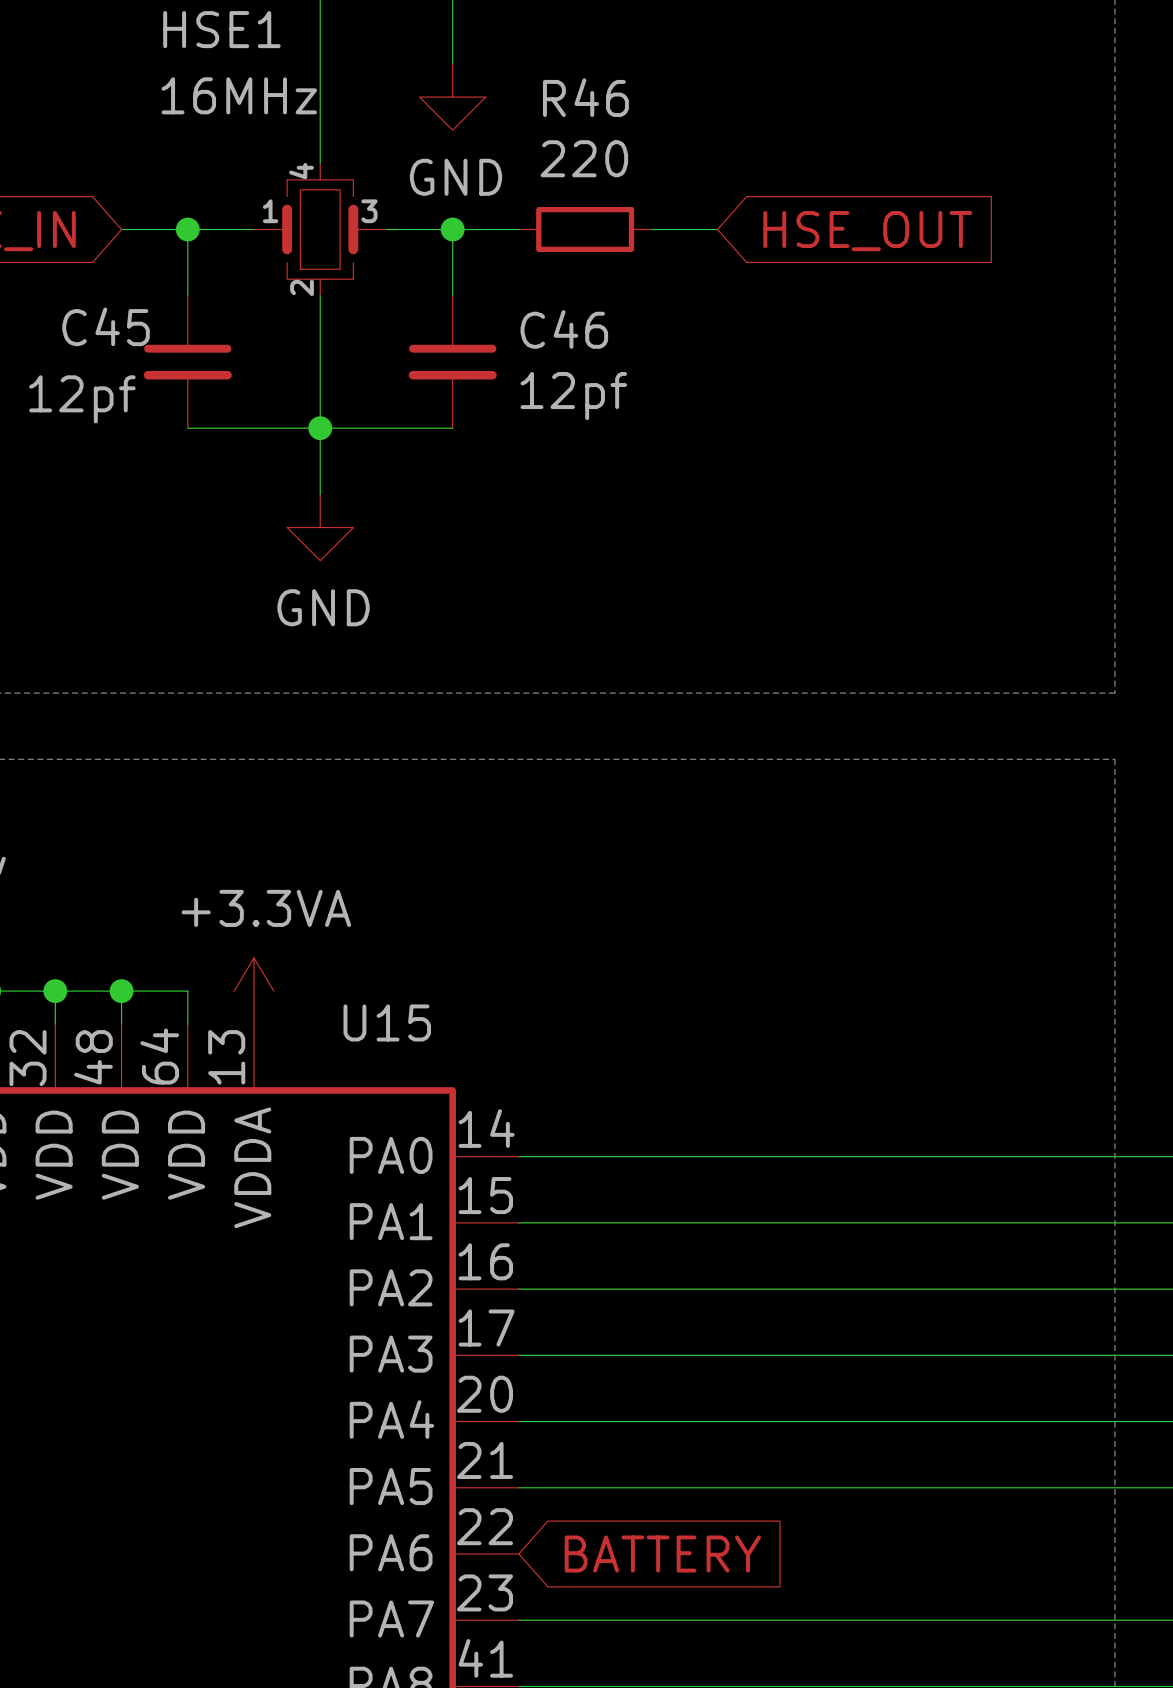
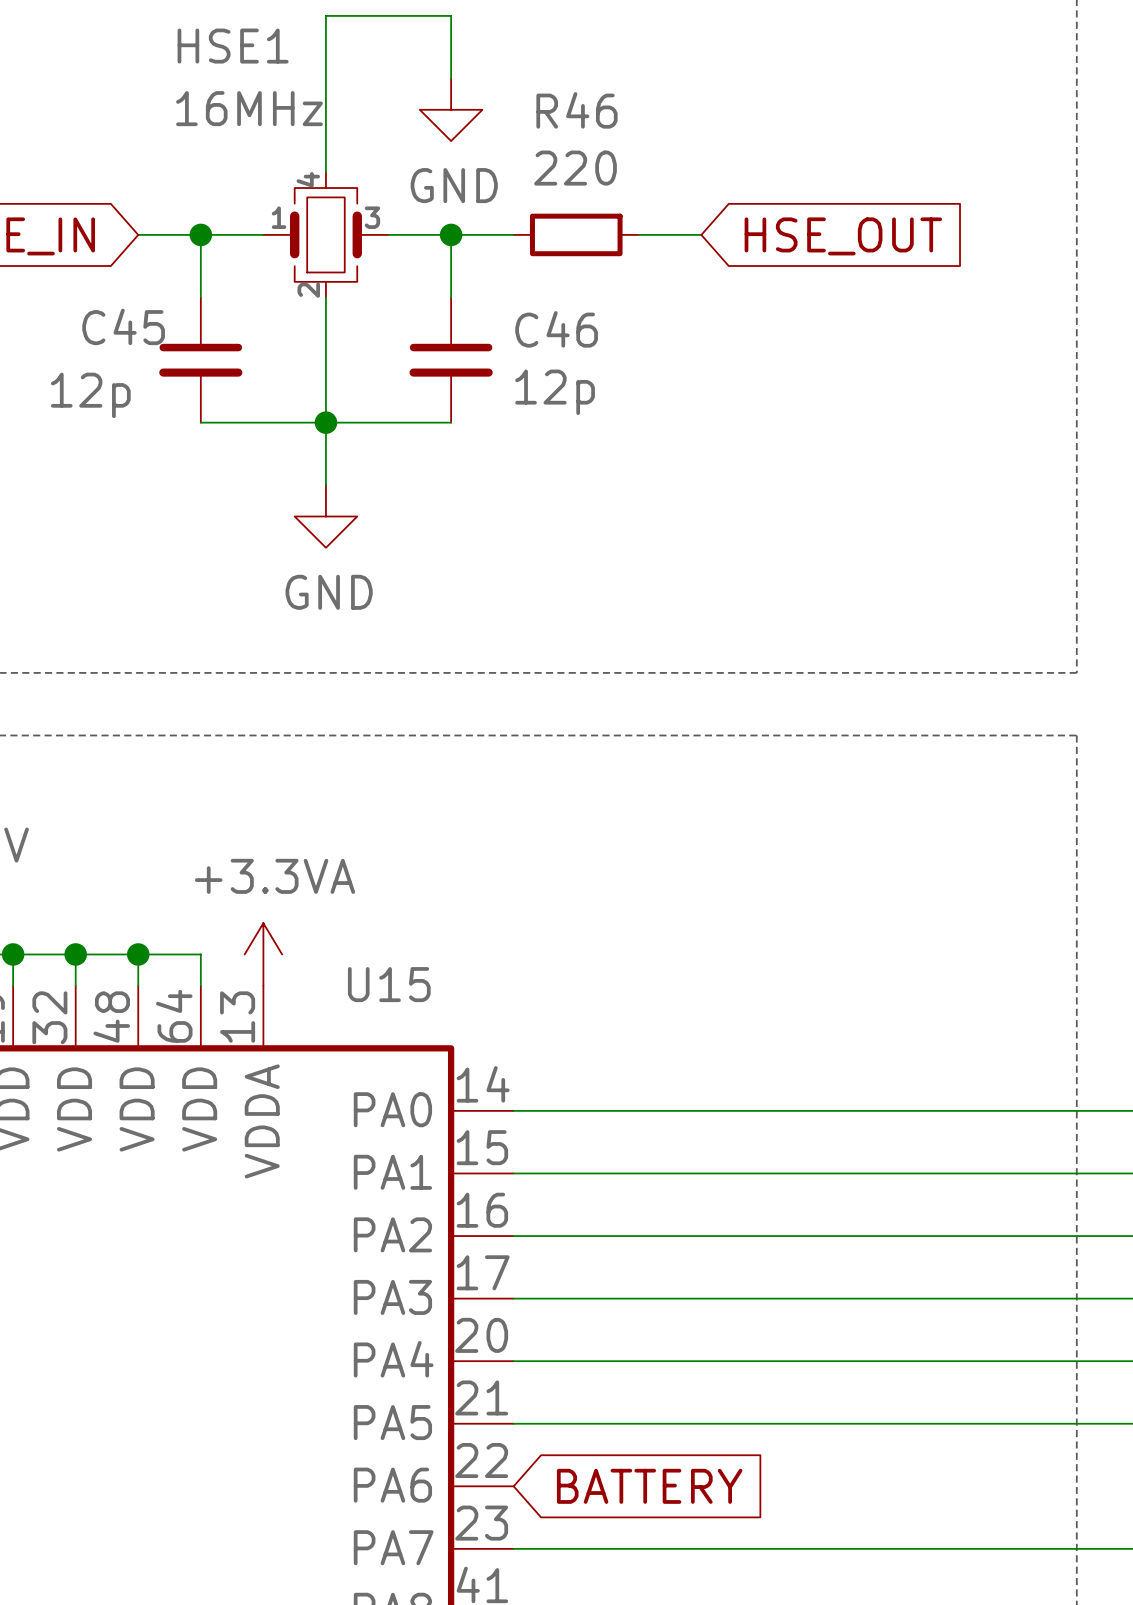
C46 value: 12pf (573, 396) -> 12p (555, 392)
C45 value: 12pf (82, 399) -> 12p (90, 395)

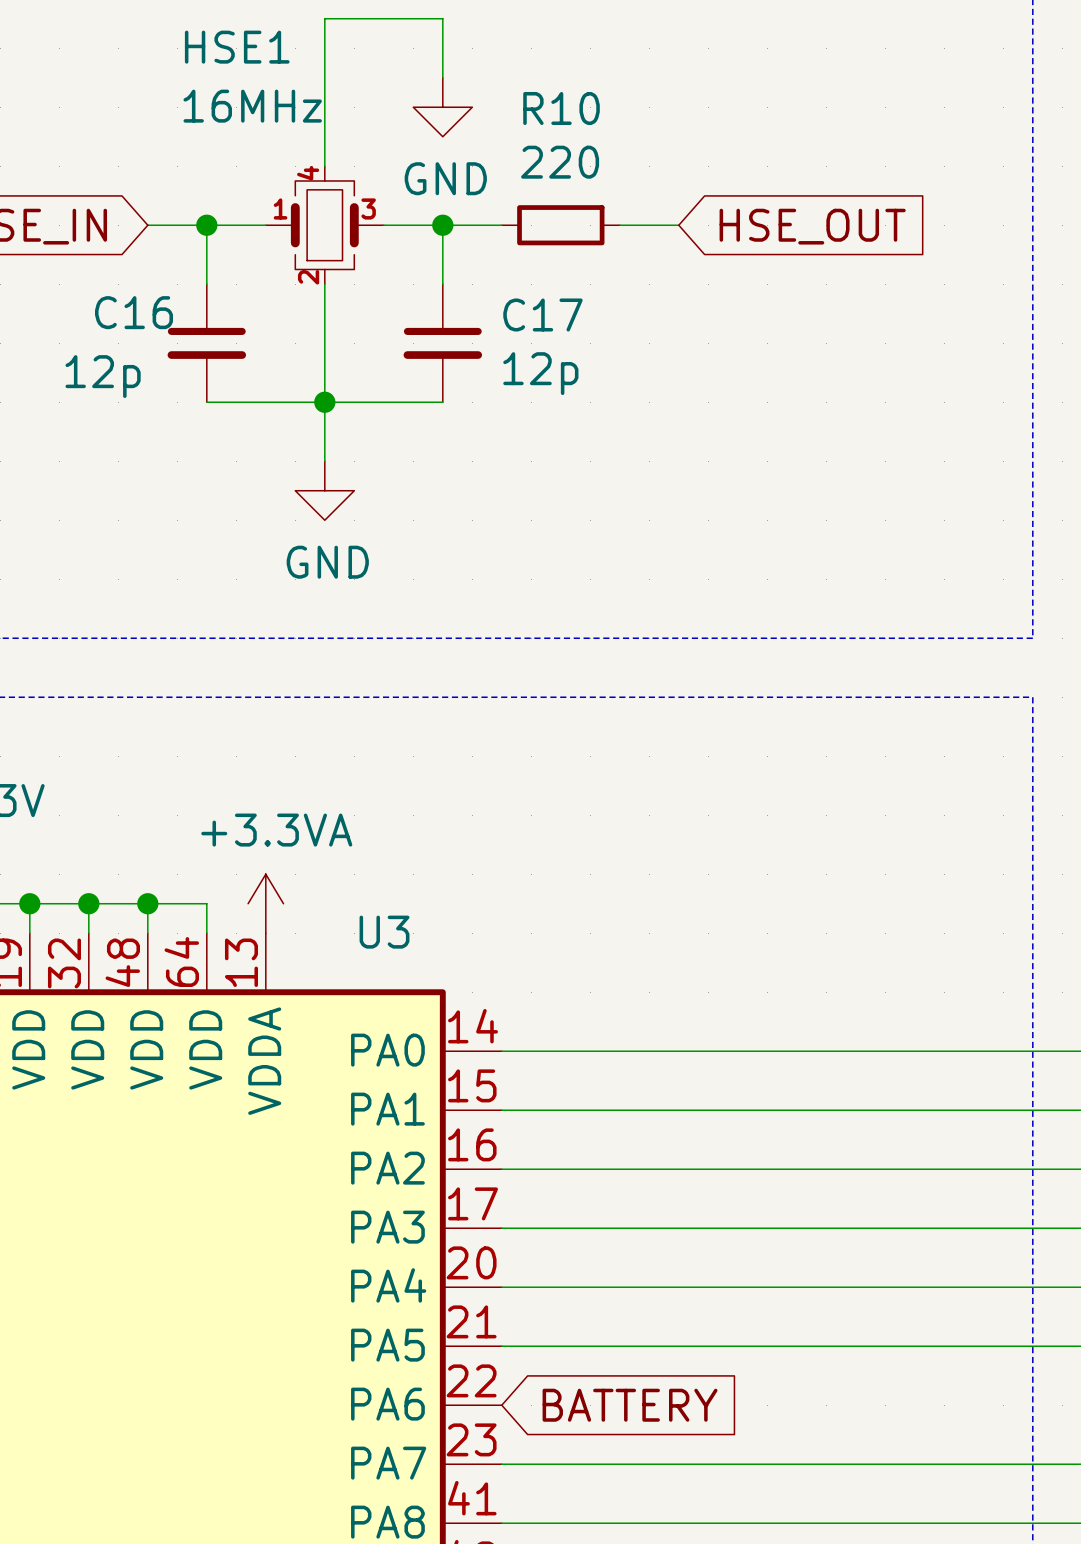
R46 name: R46 (576, 110) -> R10 (561, 108)
C45 name: C45 (123, 326) -> C16 (133, 312)
C46 name: C46 (556, 329) -> C17 (542, 315)
U15 name: U15 (389, 984) -> U3 (384, 932)

